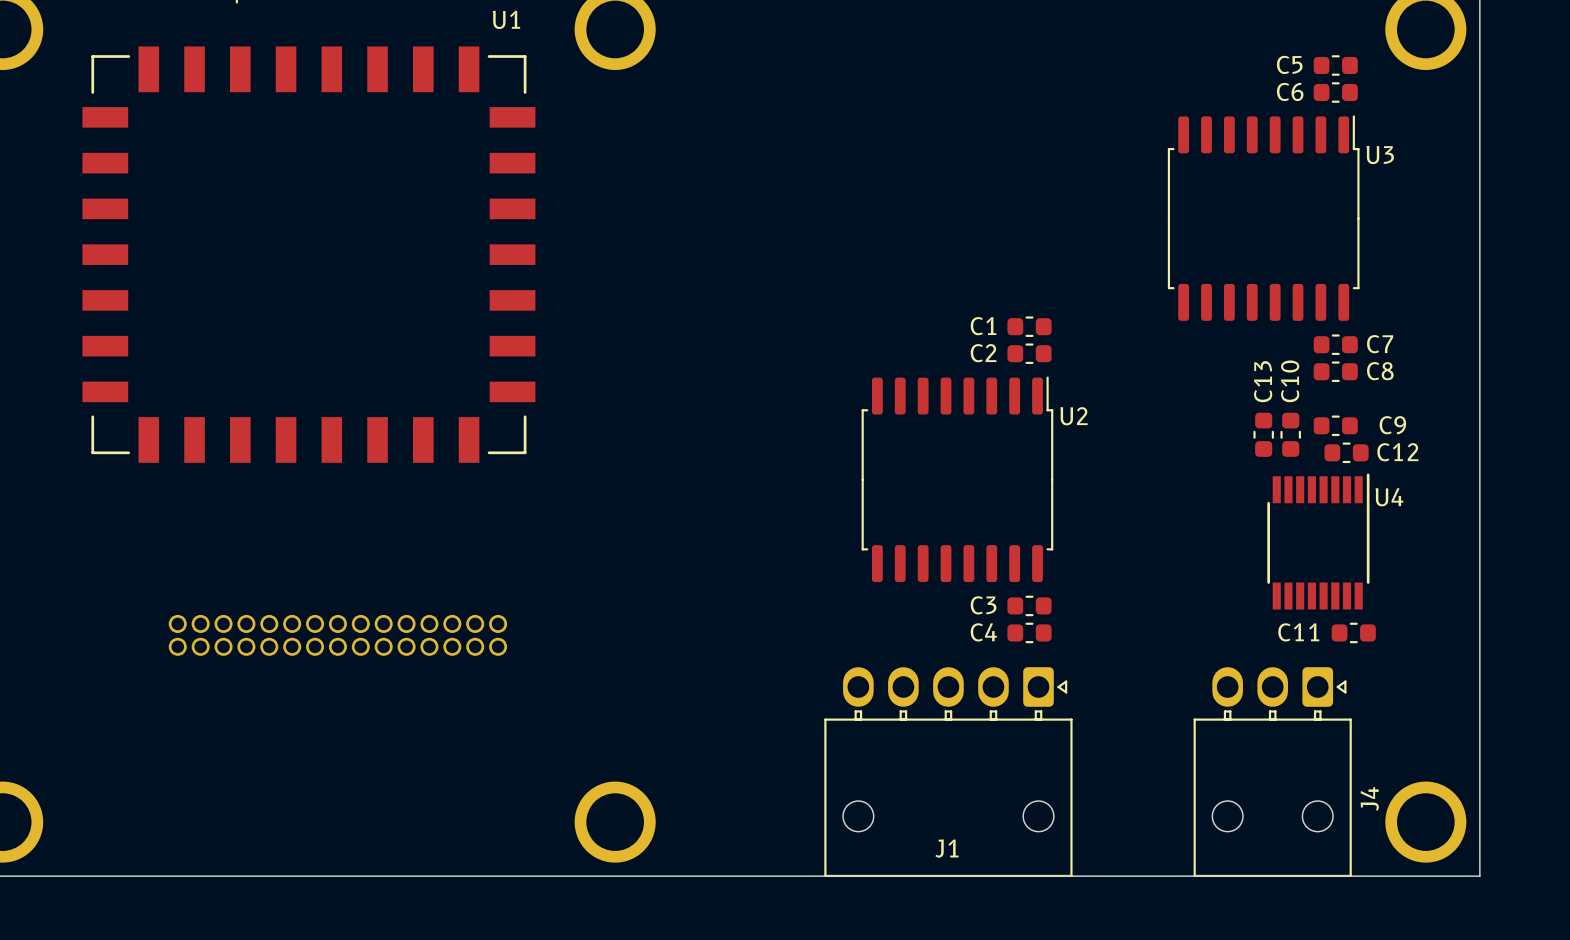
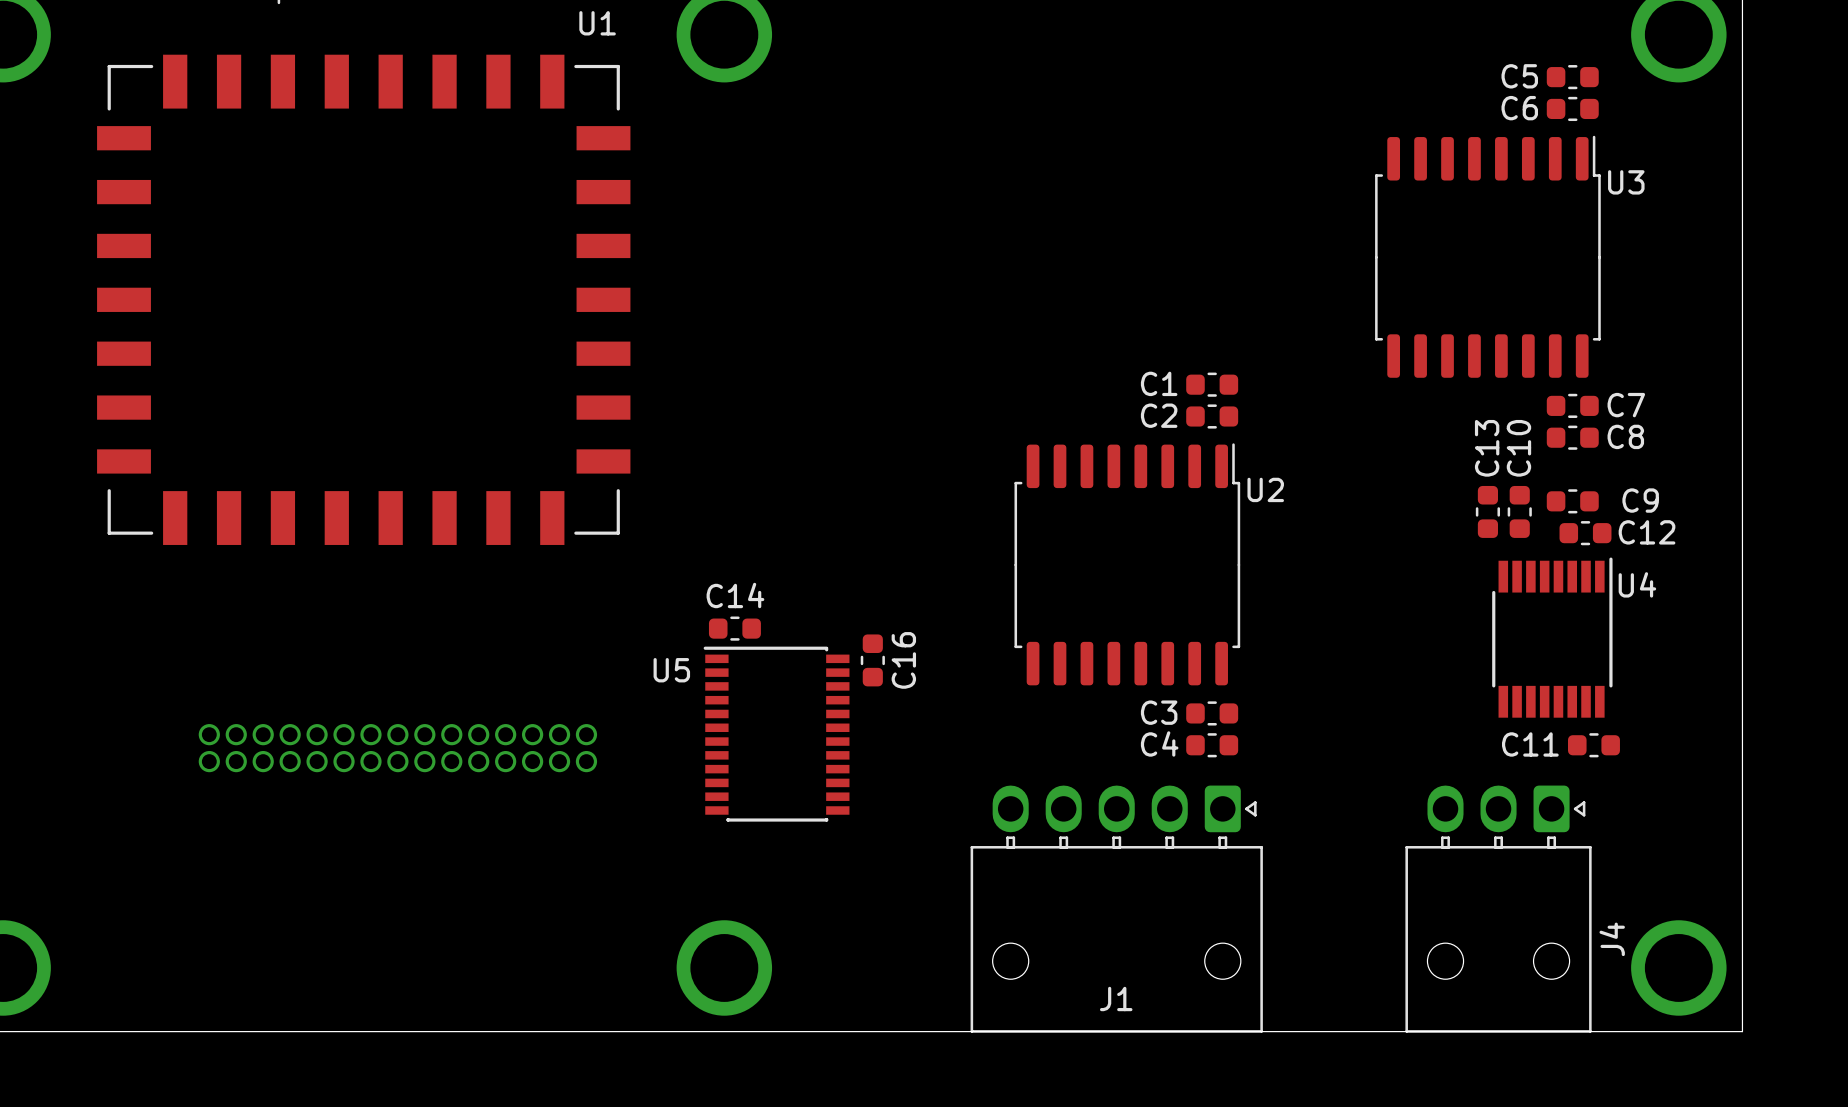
C14: none -> (734, 628)
C16: none -> (872, 660)
U5: none -> (776, 734)

